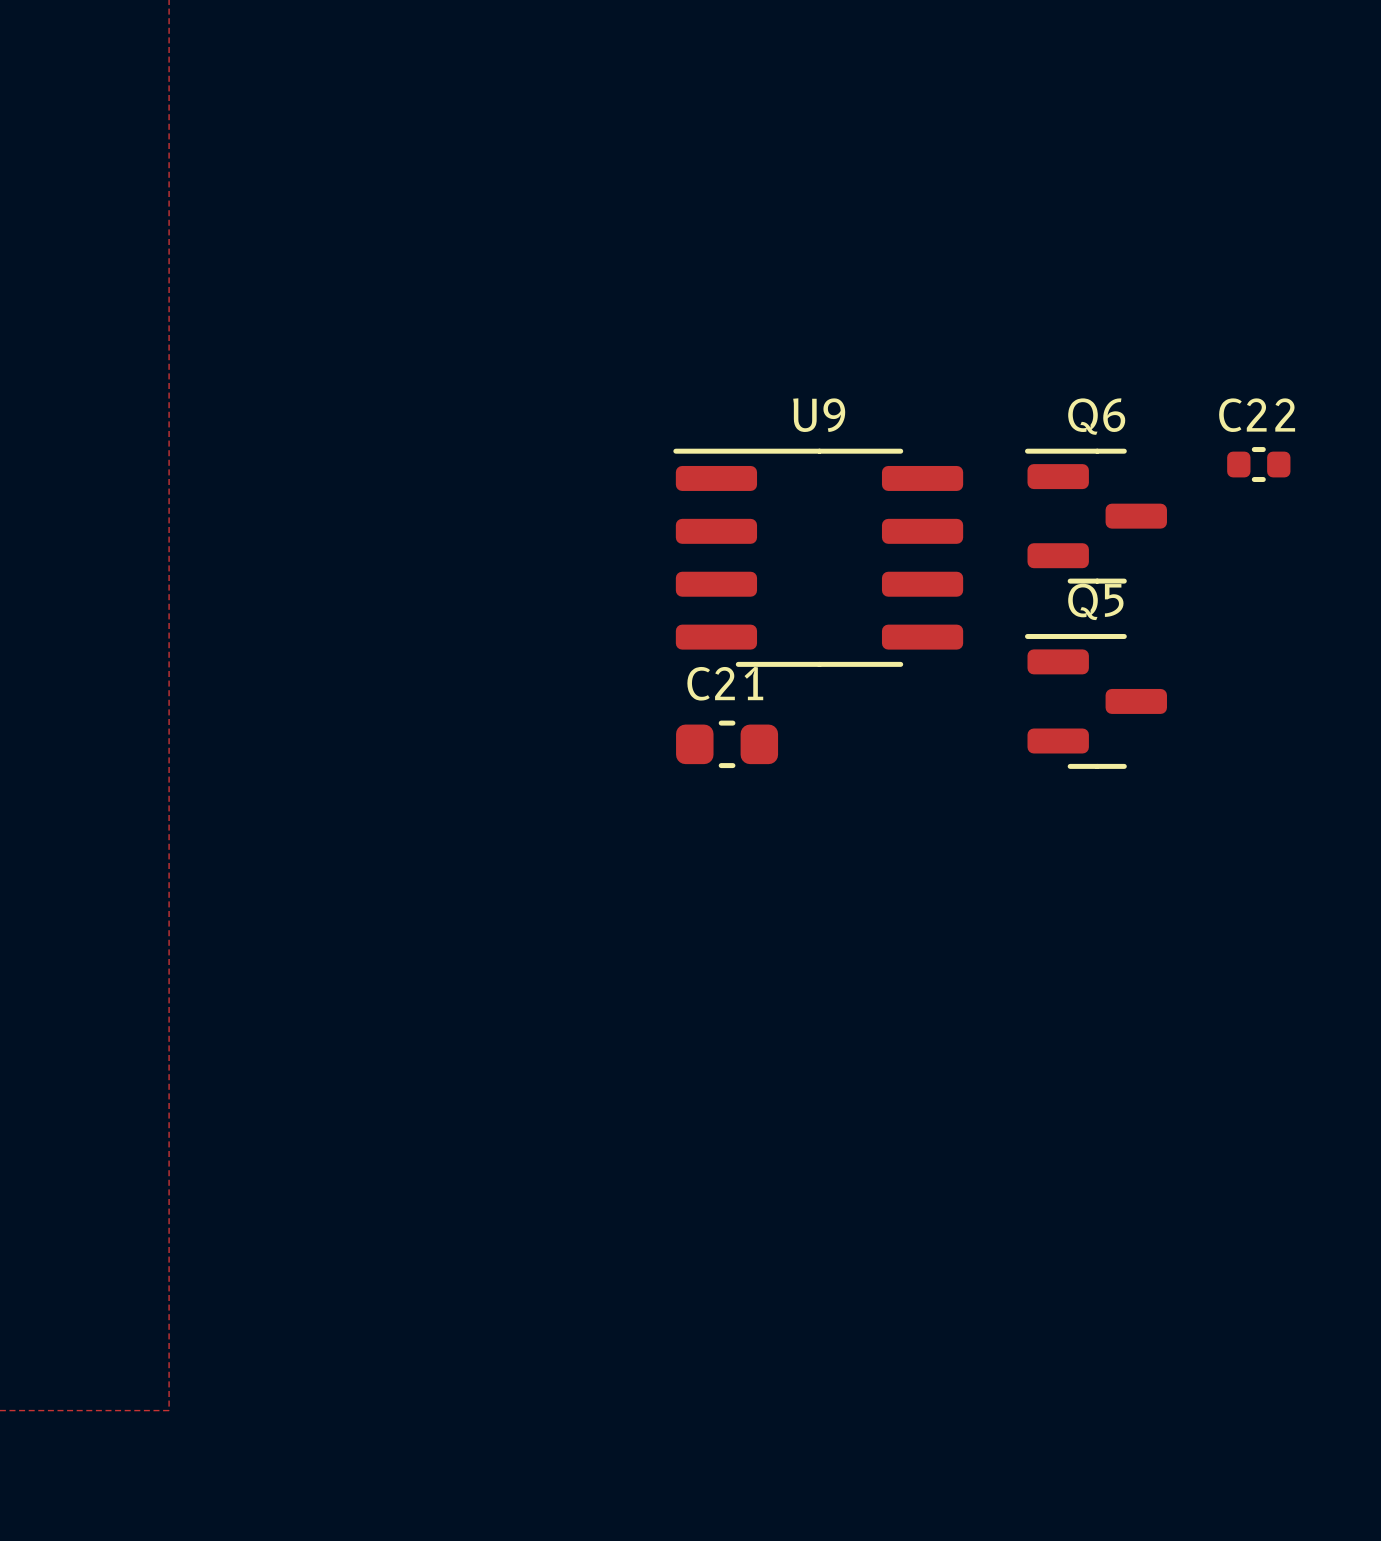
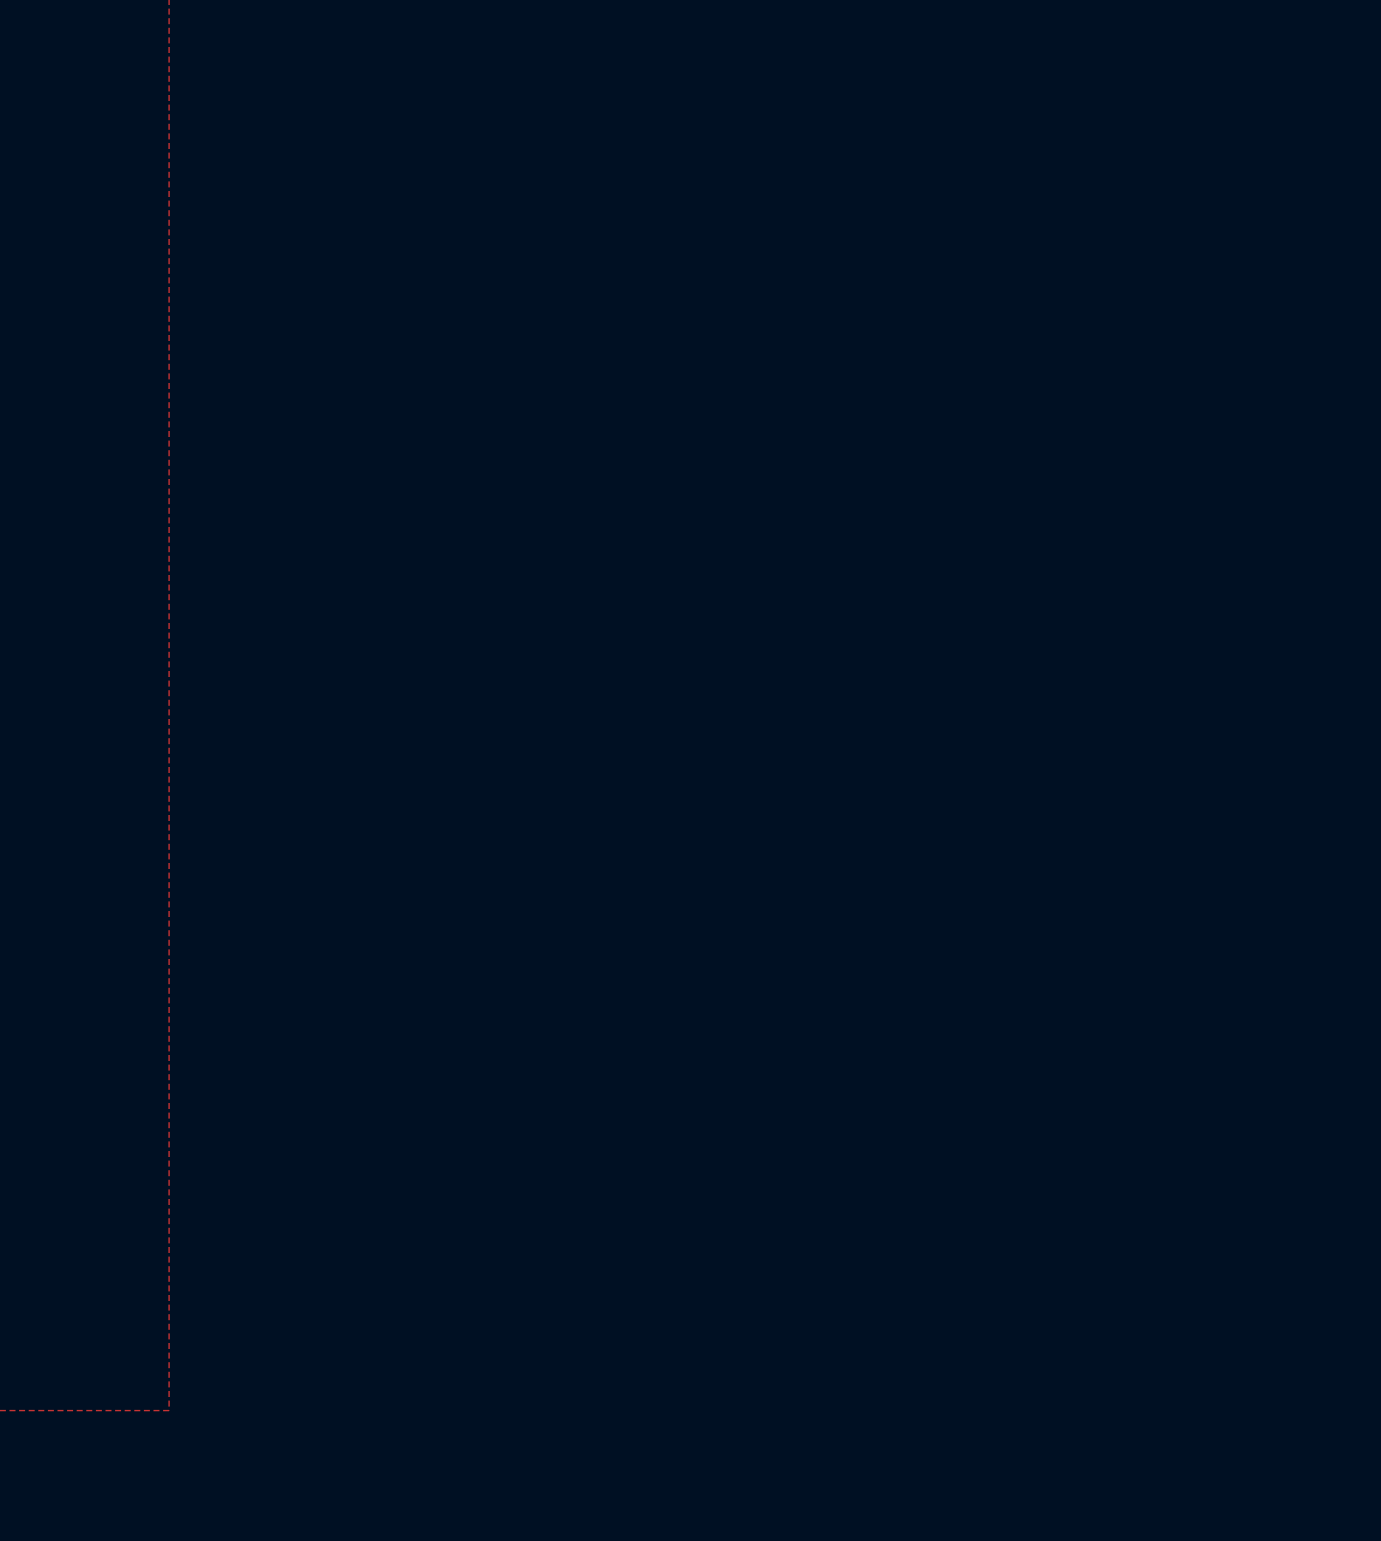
C22: (1258, 464) -> none
Q6: (1095, 516) -> none
U9: (818, 557) -> none
Q5: (1095, 701) -> none
C21: (727, 744) -> none

